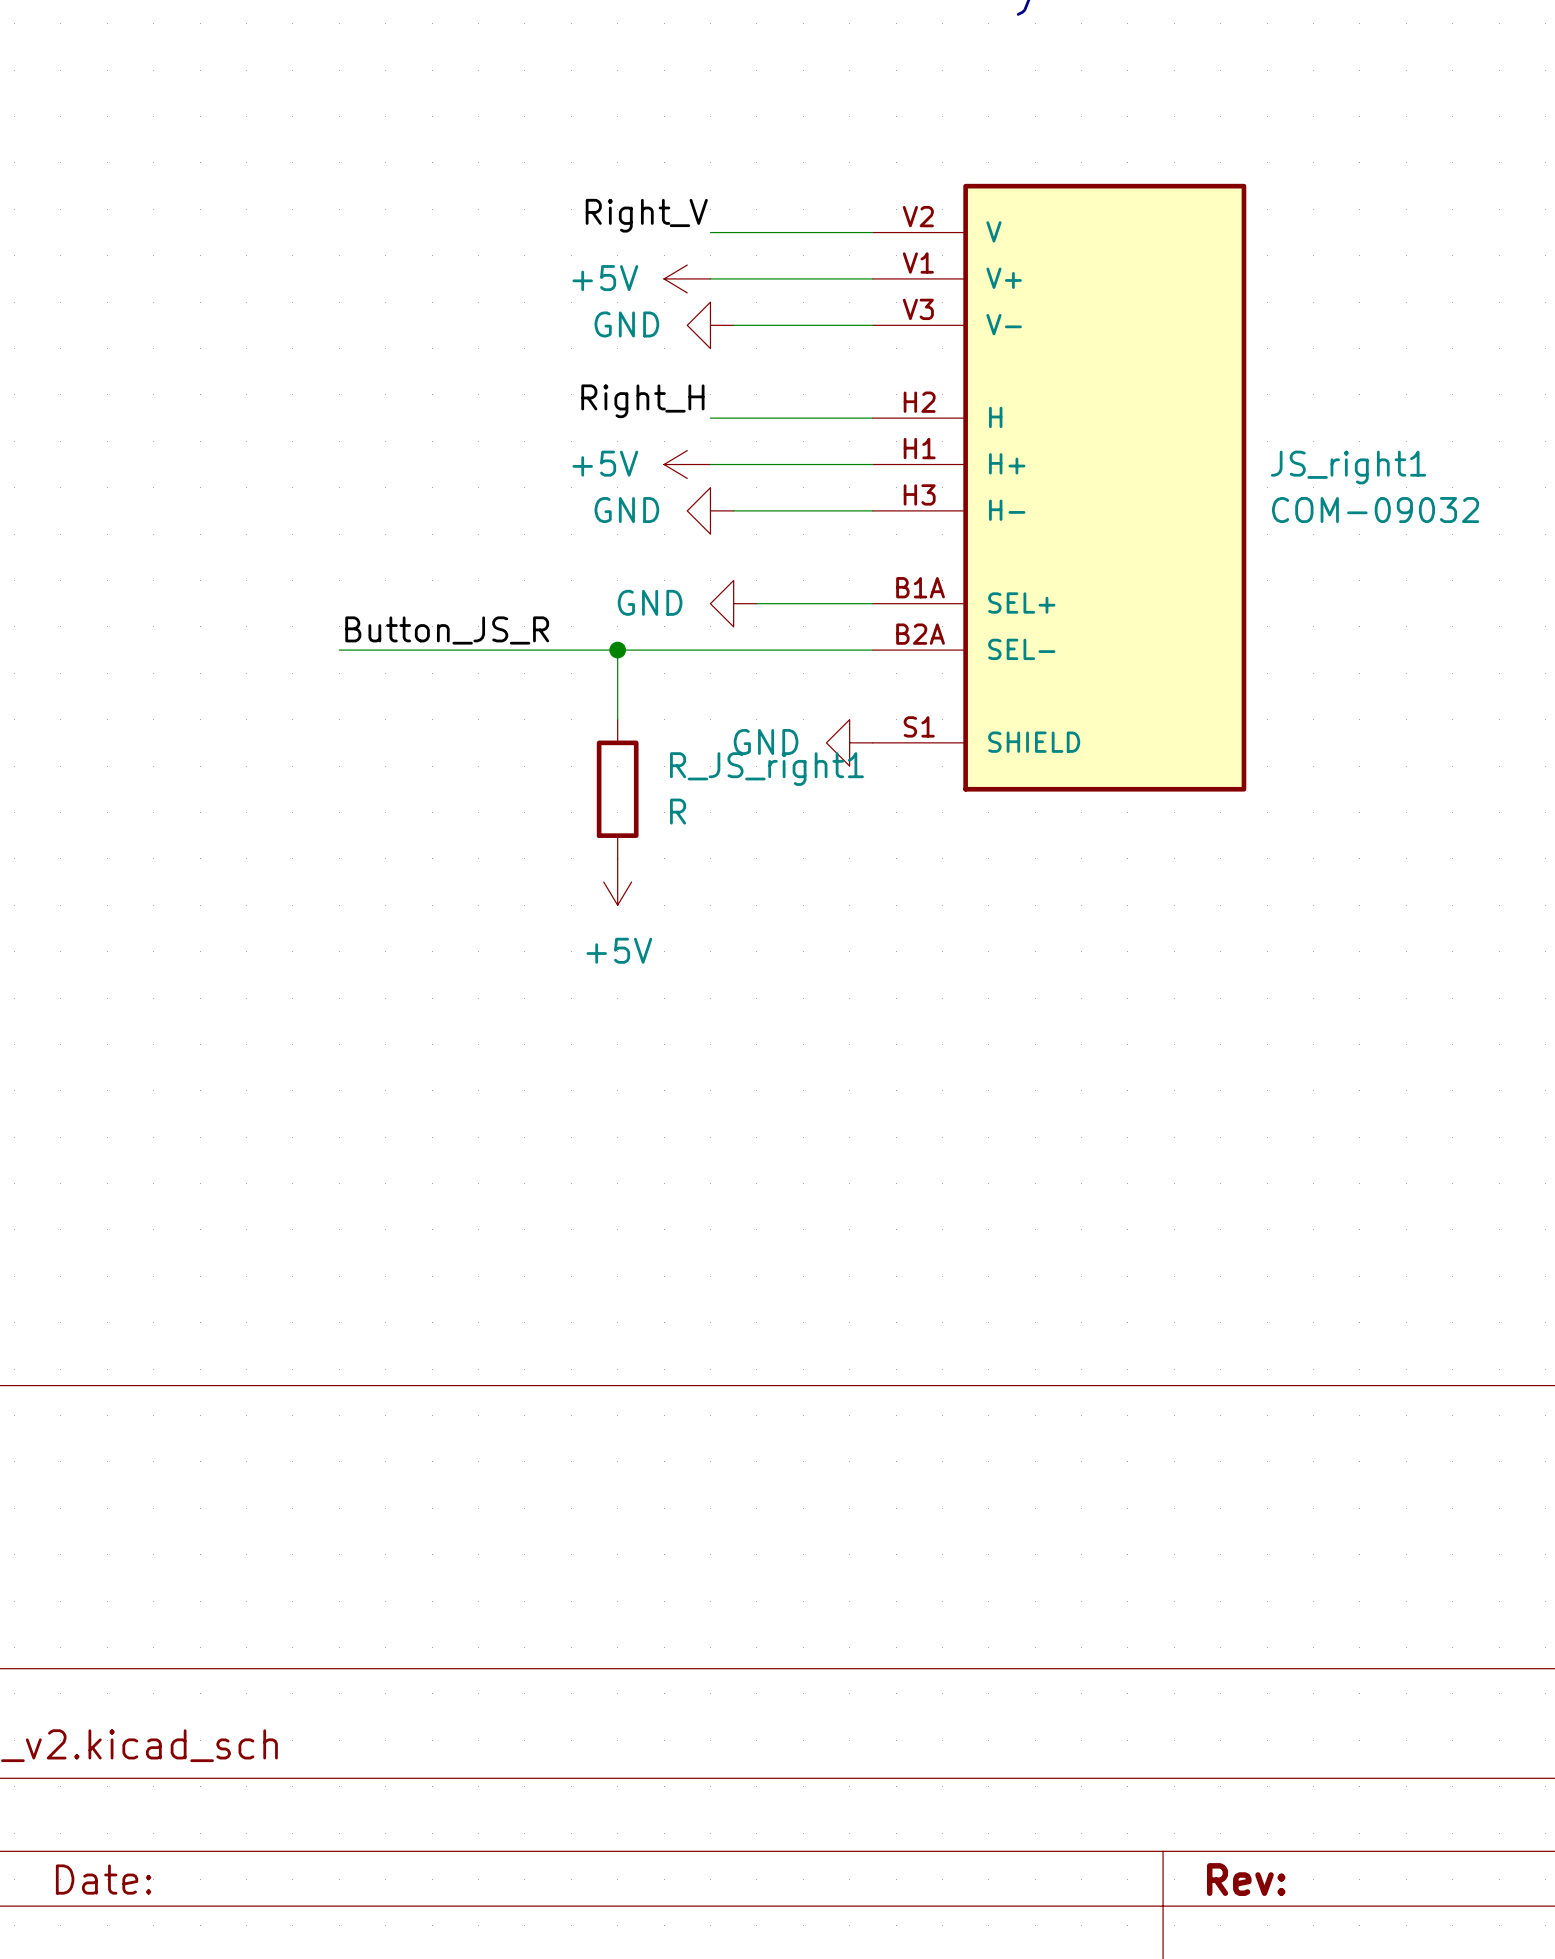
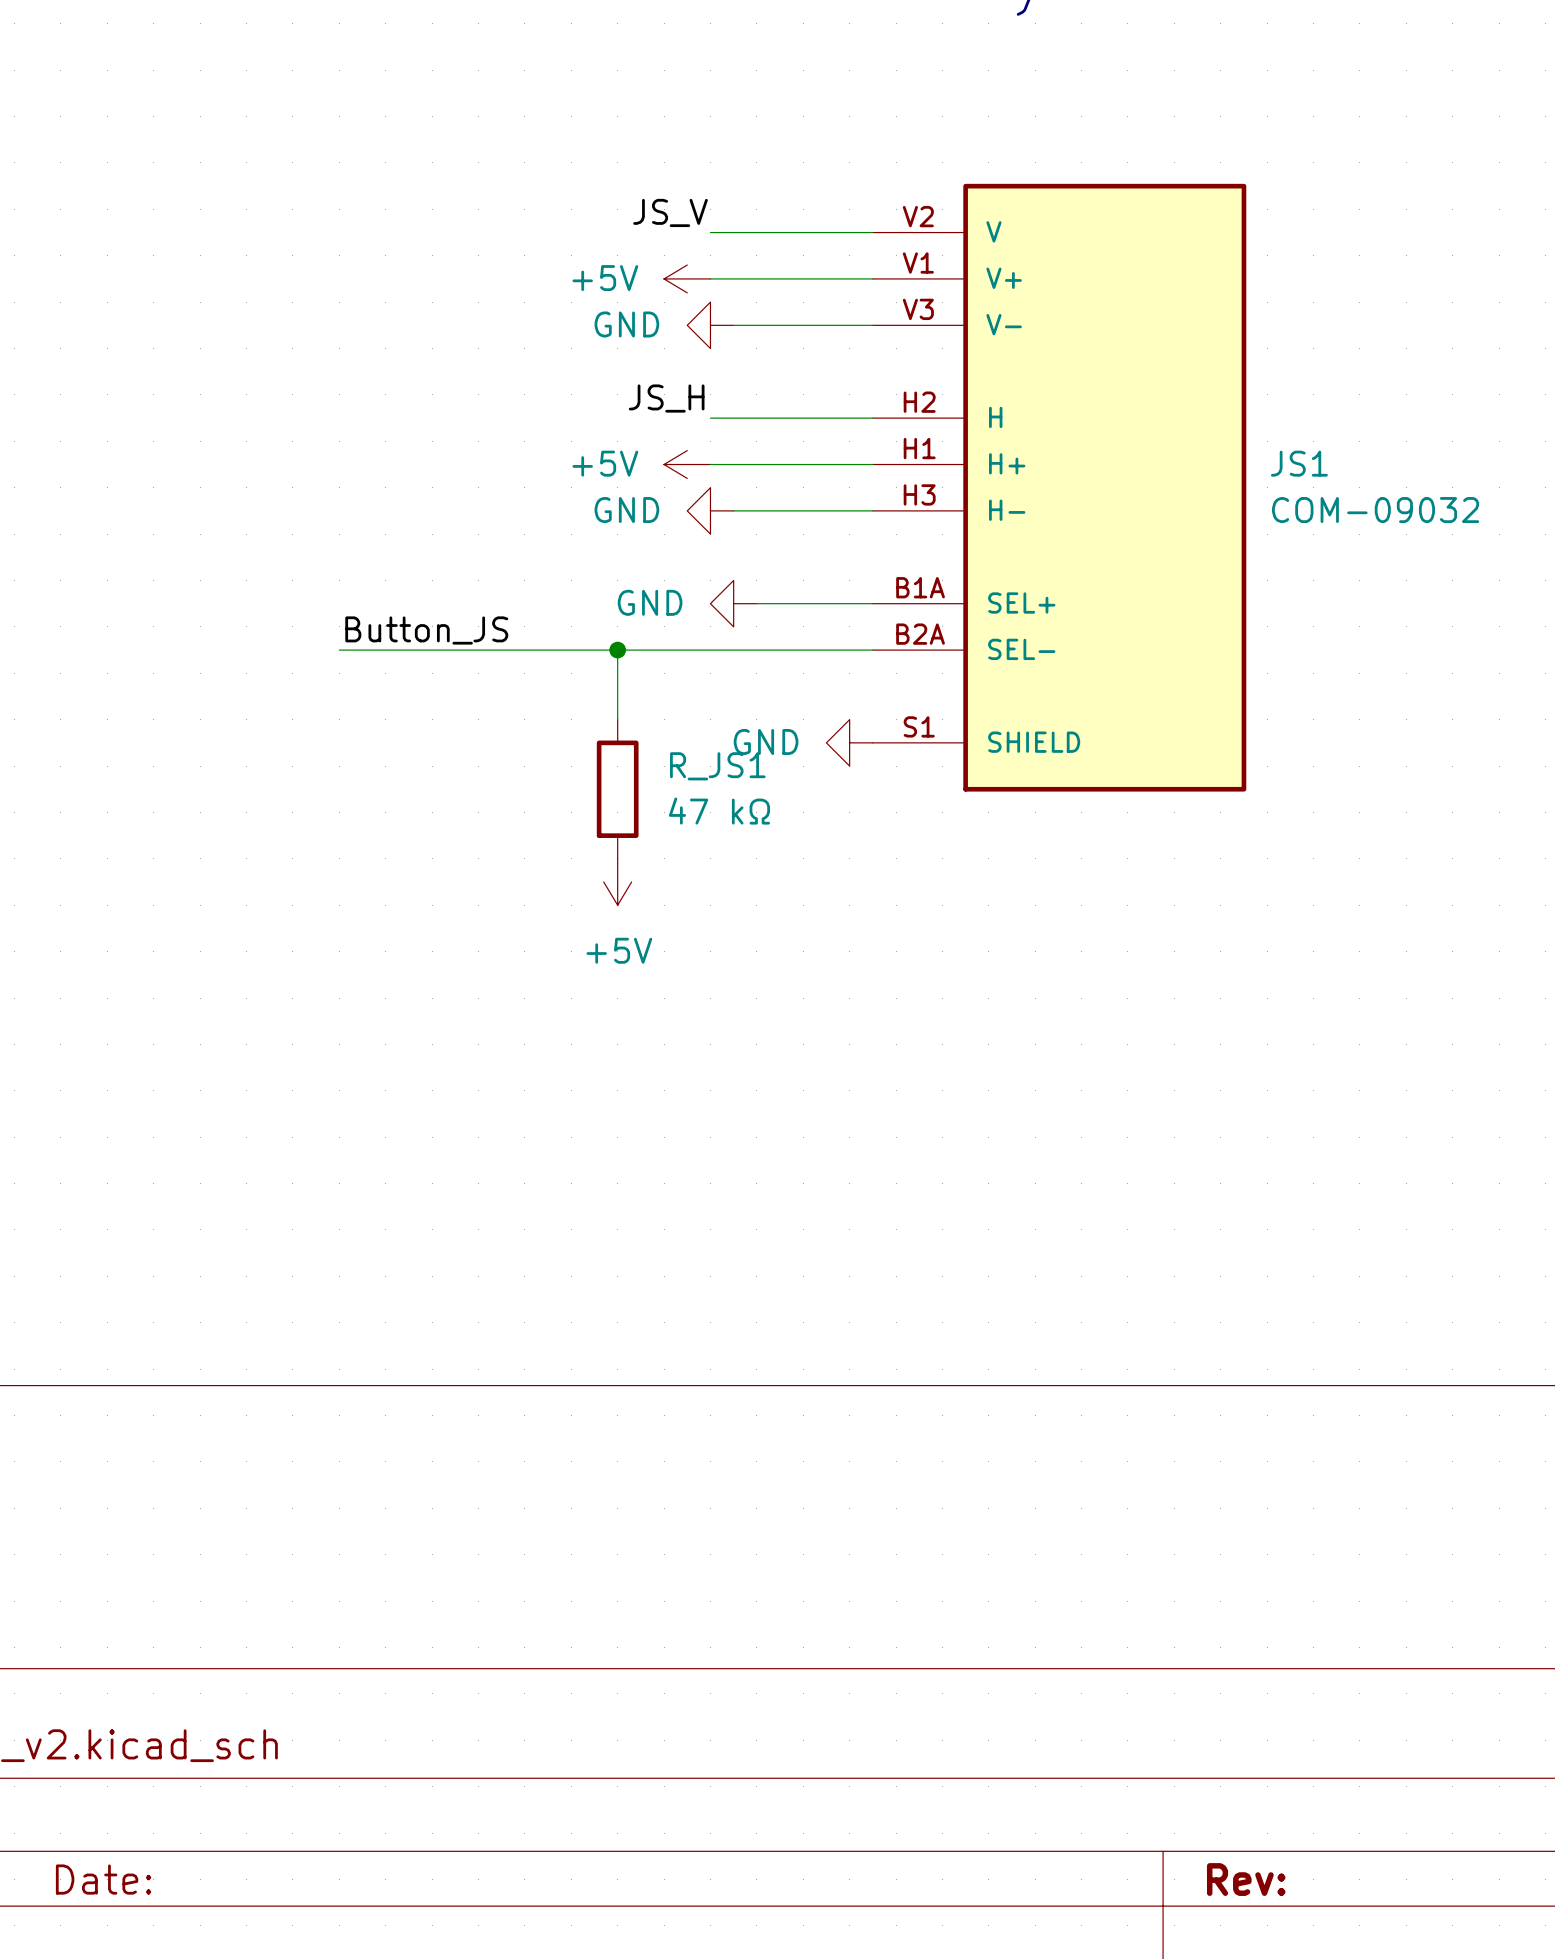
label: Right_V (646, 215) -> JS_V (670, 212)
label: Right_H (642, 401) -> JS_H (666, 398)
JS_right1 name: JS_right1 (1348, 467) -> JS1 (1299, 463)
label: Button_JS_R (447, 630) -> Button_JS (426, 630)
R_JS_right1 name: R_JS_right1 (766, 769) -> R_JS1 (717, 766)
R_JS_right1 value: R (678, 811) -> 47 kΩ (719, 811)

